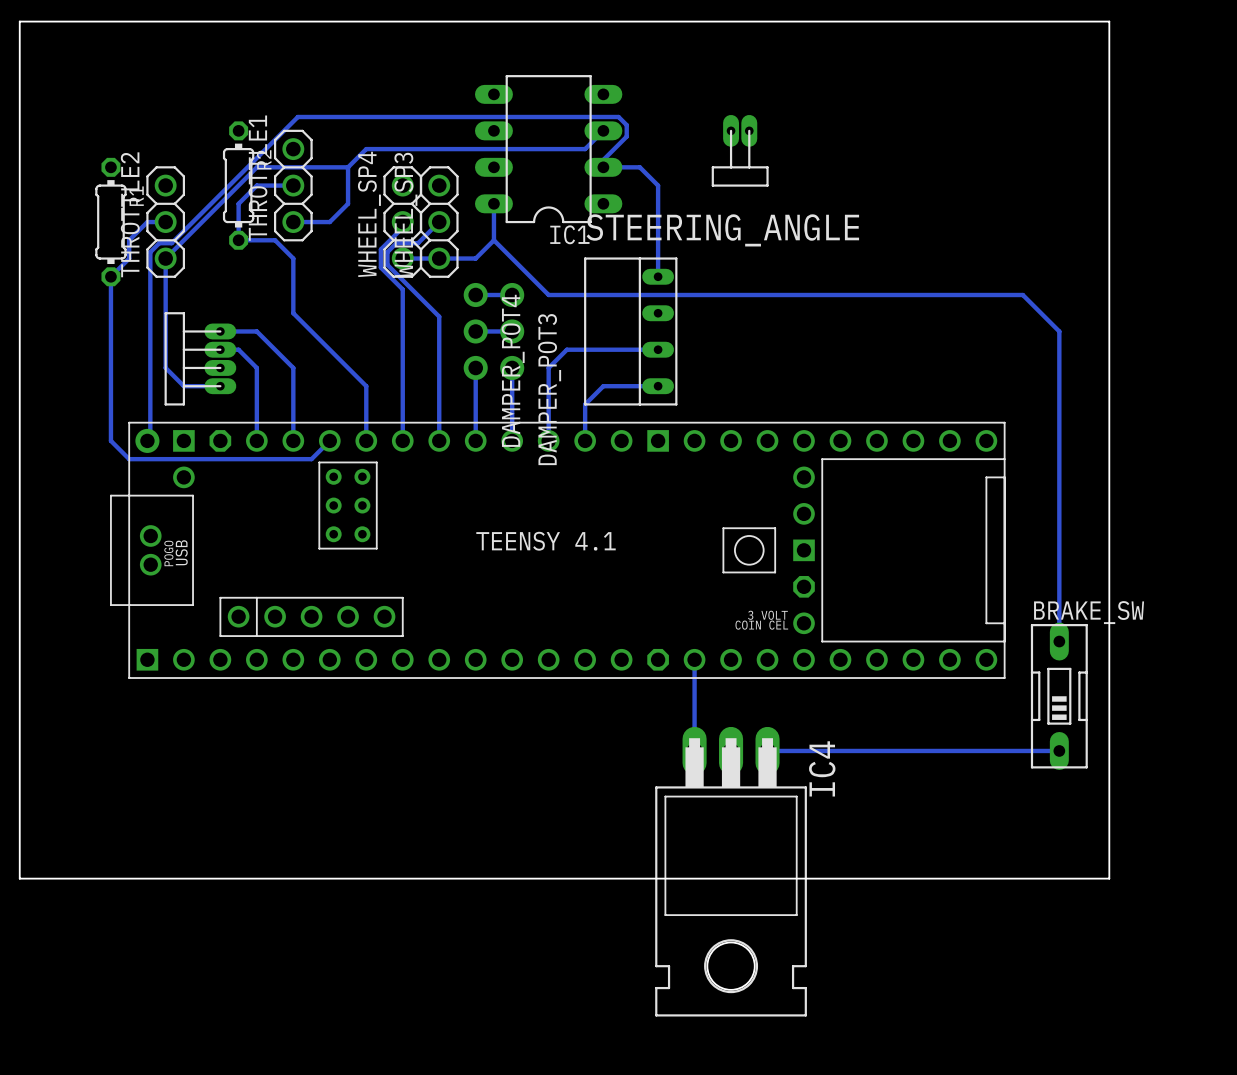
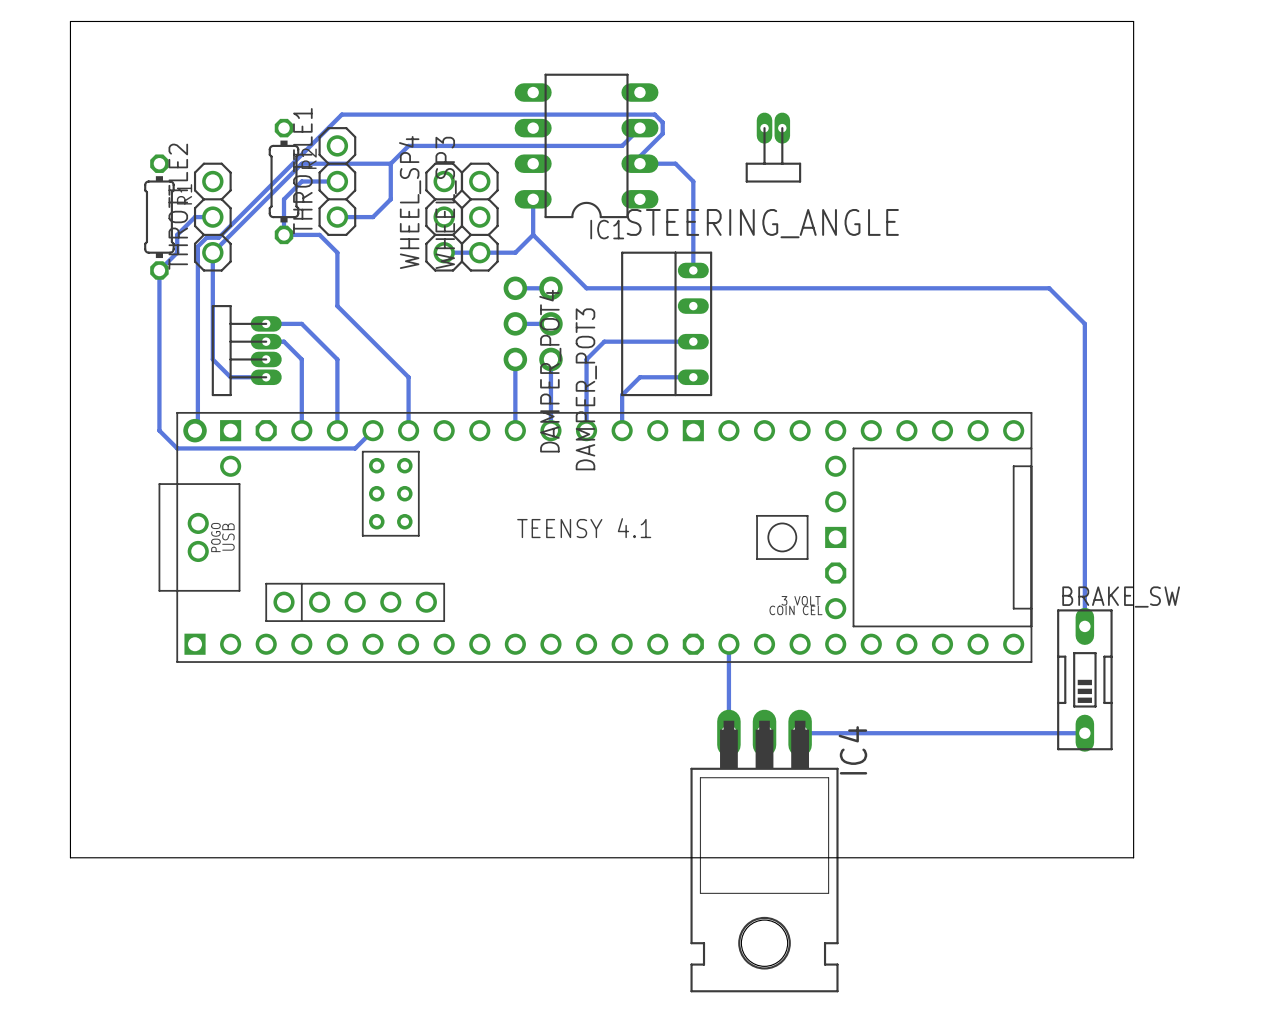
bottom track: (402, 222) (402, 227) (380, 249) (380, 267) (402, 289) (402, 440) -> none
bottom track: (439, 222) (418, 243) (396, 243) (387, 252) (387, 264) (439, 316) (439, 440) -> none

